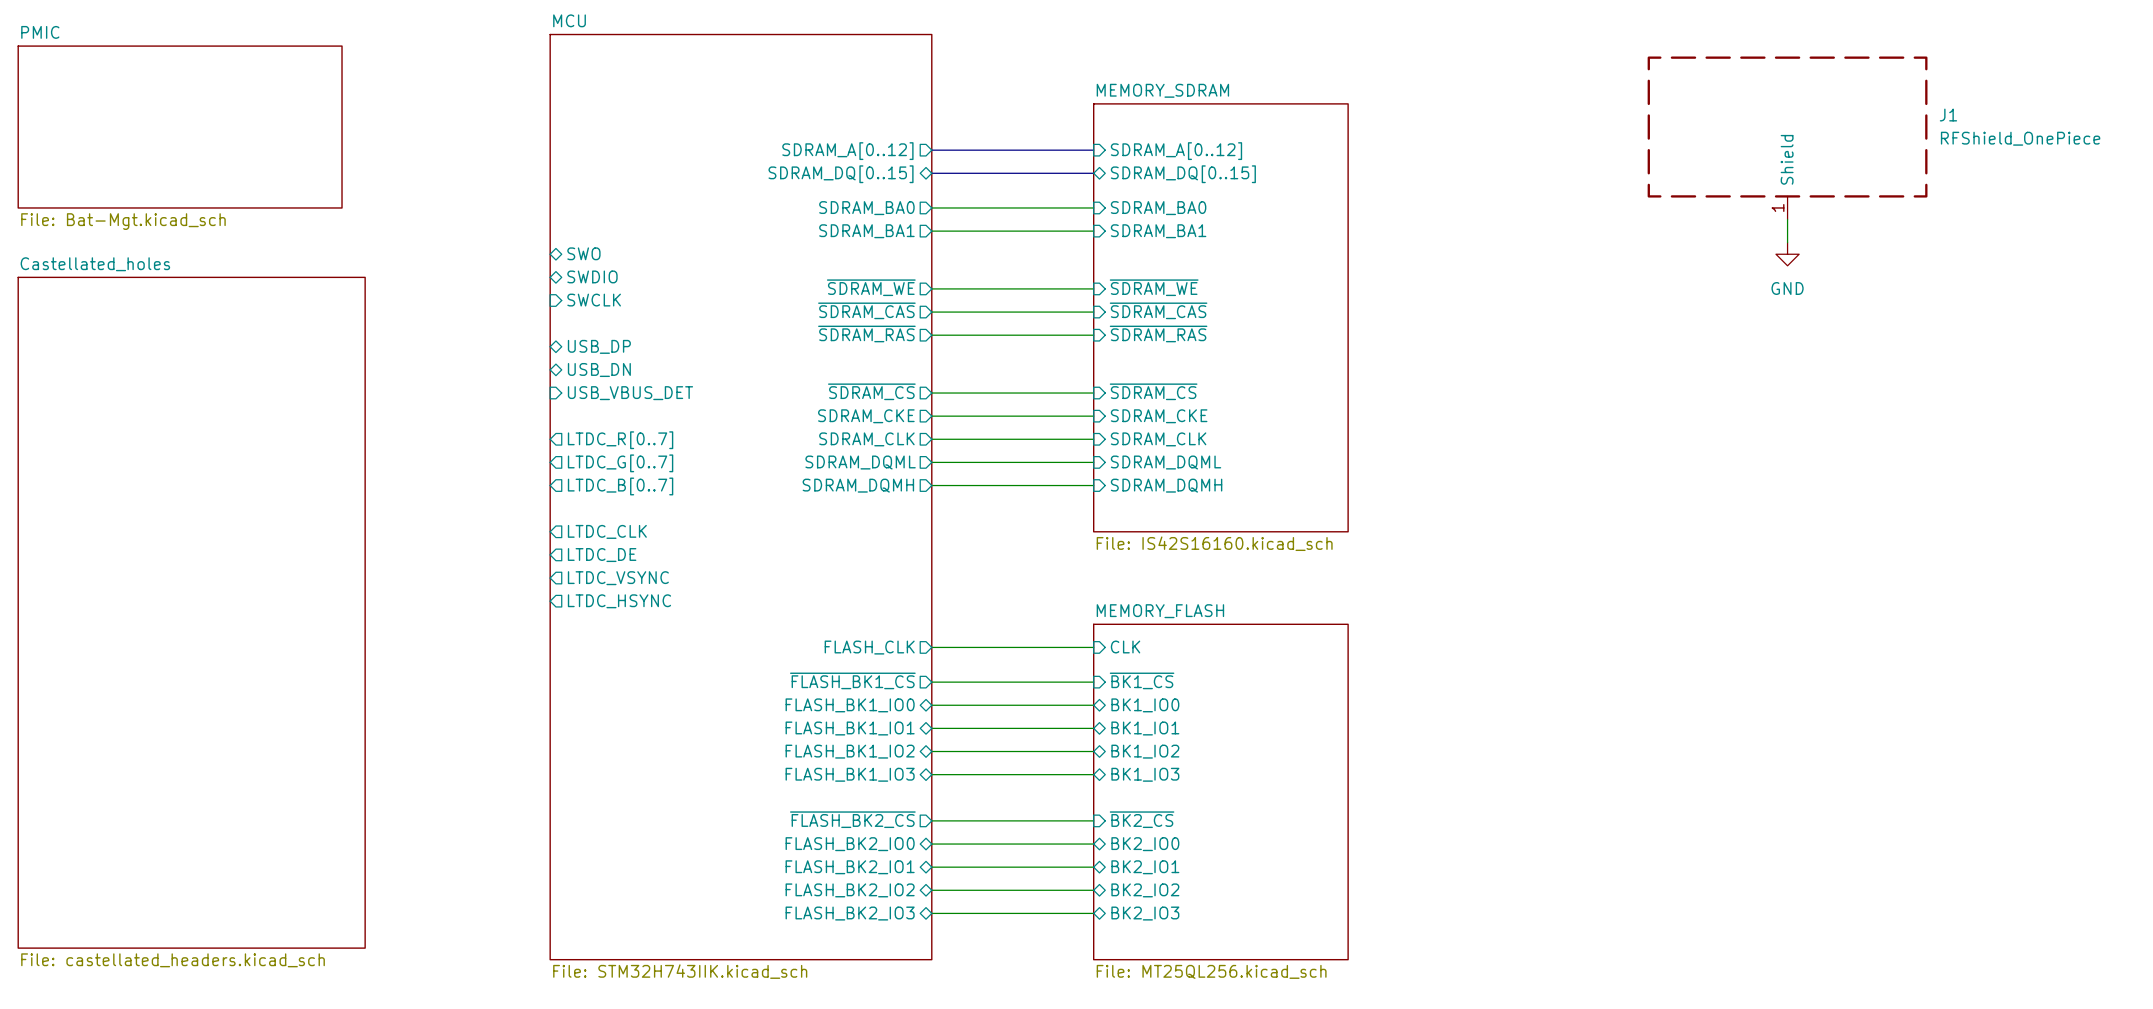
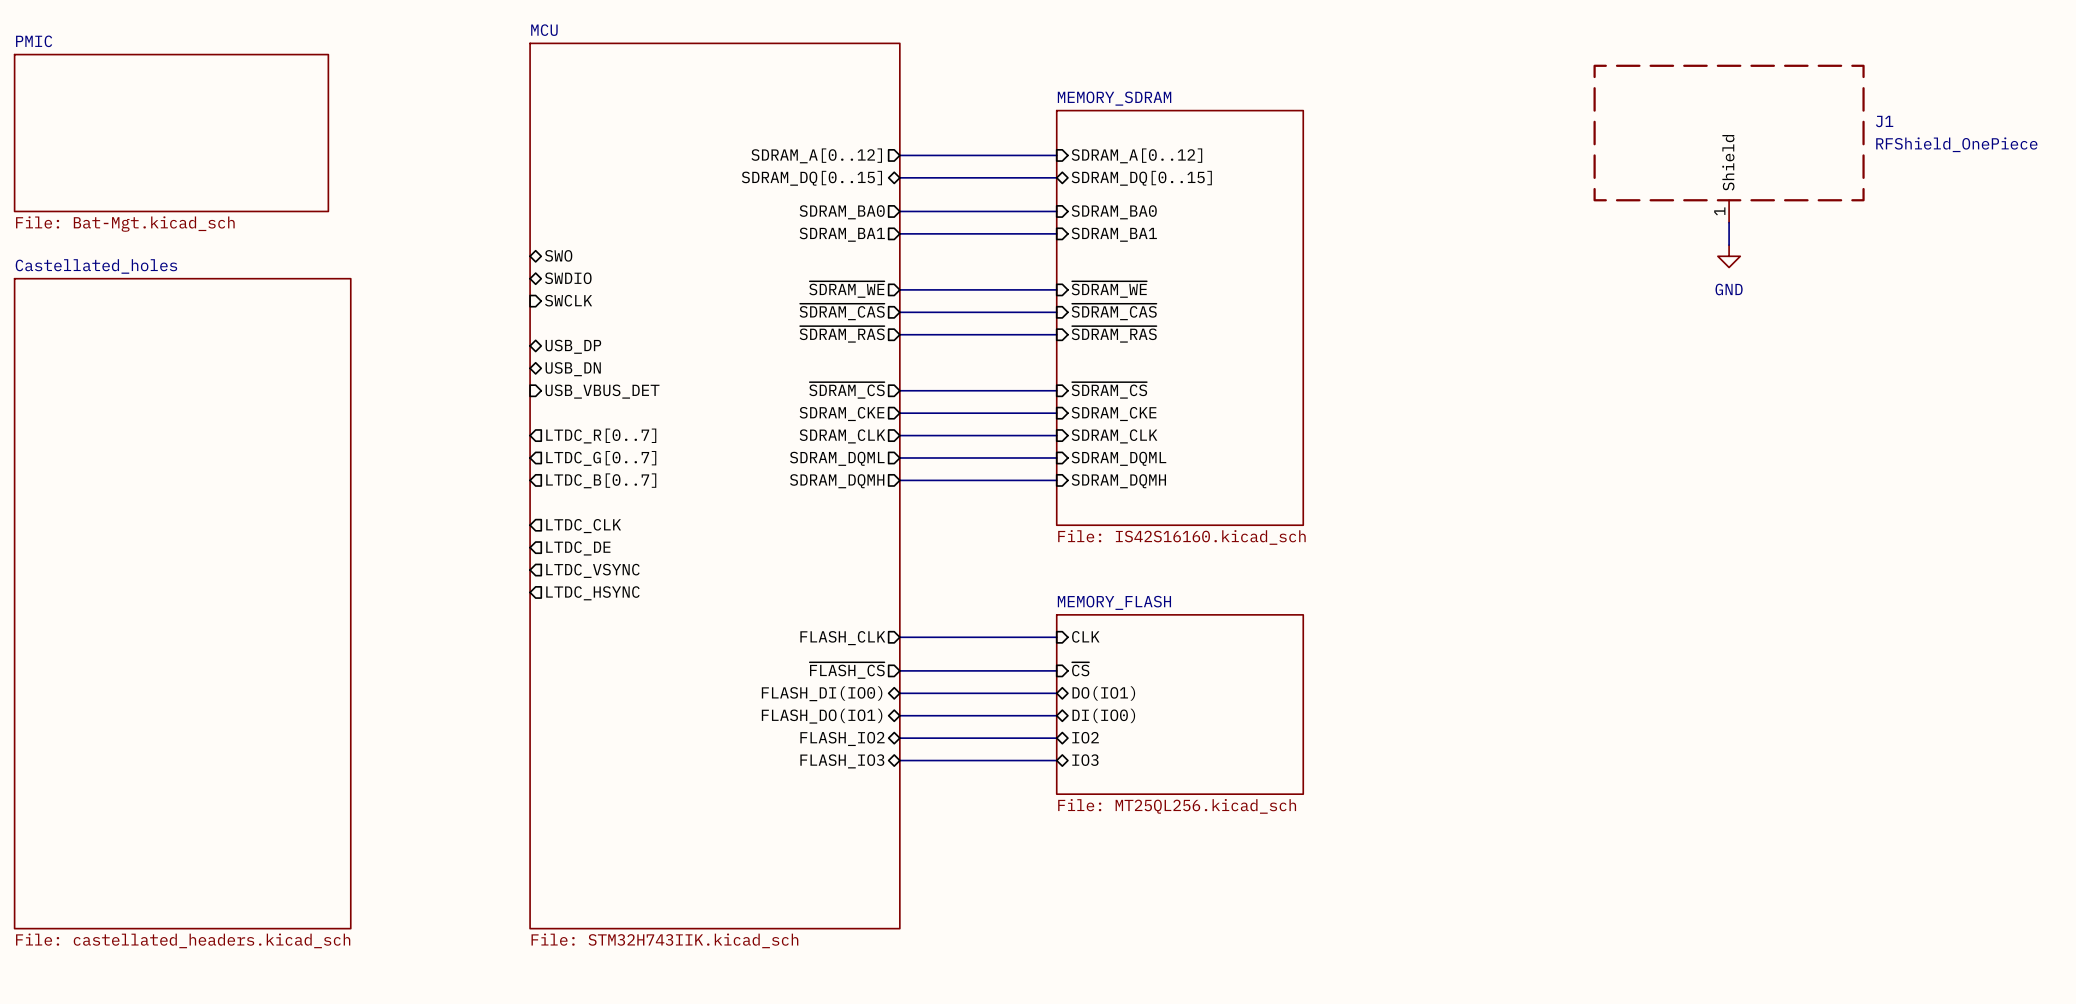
sheet MCU shape: [549, 33, 933, 961] -> [529, 42, 901, 930]
sheet pin: ~{FLASH_BK1_CS} (852, 680) -> ~{FLASH_CS} (847, 670)
sheet pin: ~{BK1_CS} (1142, 680) -> ~{CS} (1080, 669)
sheet pin: FLASH_BK1_IO0 (850, 705) -> FLASH_DI(IO0) (822, 693)
sheet pin: BK1_IO0 (1145, 705) -> DO(IO1) (1103, 693)
sheet MEMORY_FLASH: none -> File: MT25QL256.kicad_sch (1179, 704)
sheet pin: FLASH_BK1_IO1 (850, 728) -> FLASH_DO(IO1) (822, 716)
sheet pin: BK1_IO1 (1145, 728) -> DI(IO0) (1103, 715)
sheet pin: FLASH_BK1_IO2 (850, 751) -> FLASH_IO2 (842, 738)
sheet pin: BK1_IO2 (1145, 751) -> IO2 (1085, 737)
sheet pin: FLASH_BK1_IO3 (850, 774) -> FLASH_IO3 (842, 761)
sheet pin: BK1_IO3 (1145, 774) -> IO3 (1085, 760)
sheet MEMORY_FLASH: File: MT25QL256.kicad_sch (1220, 791) -> none
sheet pin: ~{FLASH_BK2_CS} (852, 819) -> none
sheet pin: ~{BK2_CS} (1142, 819) -> none
wire: (931, 820) (1093, 820) -> none
sheet pin: FLASH_BK2_IO0 (850, 844) -> none
wire: (931, 844) (1093, 844) -> none
sheet pin: BK2_IO0 (1145, 844) -> none
sheet pin: FLASH_BK2_IO1 (850, 867) -> none
wire: (931, 867) (1093, 867) -> none
sheet pin: BK2_IO1 (1145, 867) -> none
sheet pin: FLASH_BK2_IO2 (850, 890) -> none
wire: (931, 890) (1093, 890) -> none
sheet pin: BK2_IO2 (1145, 890) -> none
sheet pin: FLASH_BK2_IO3 (850, 913) -> none
wire: (931, 913) (1093, 913) -> none
sheet pin: BK2_IO3 (1145, 913) -> none

